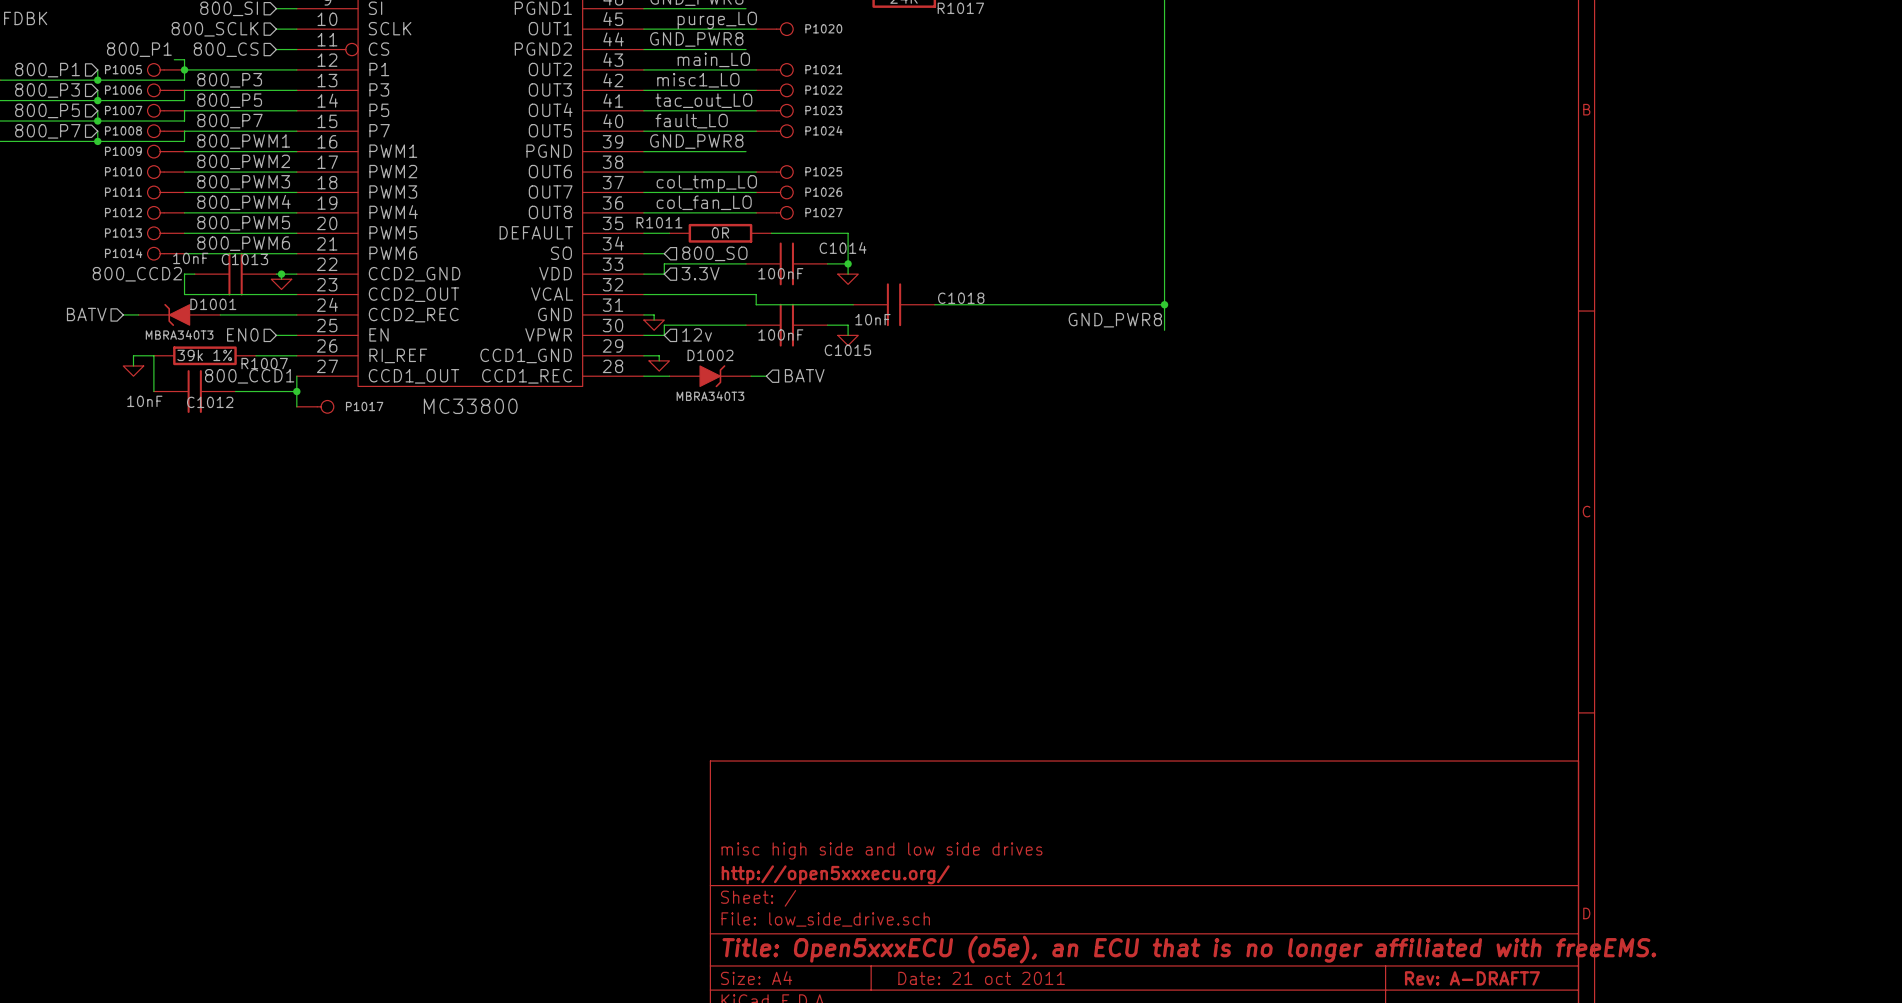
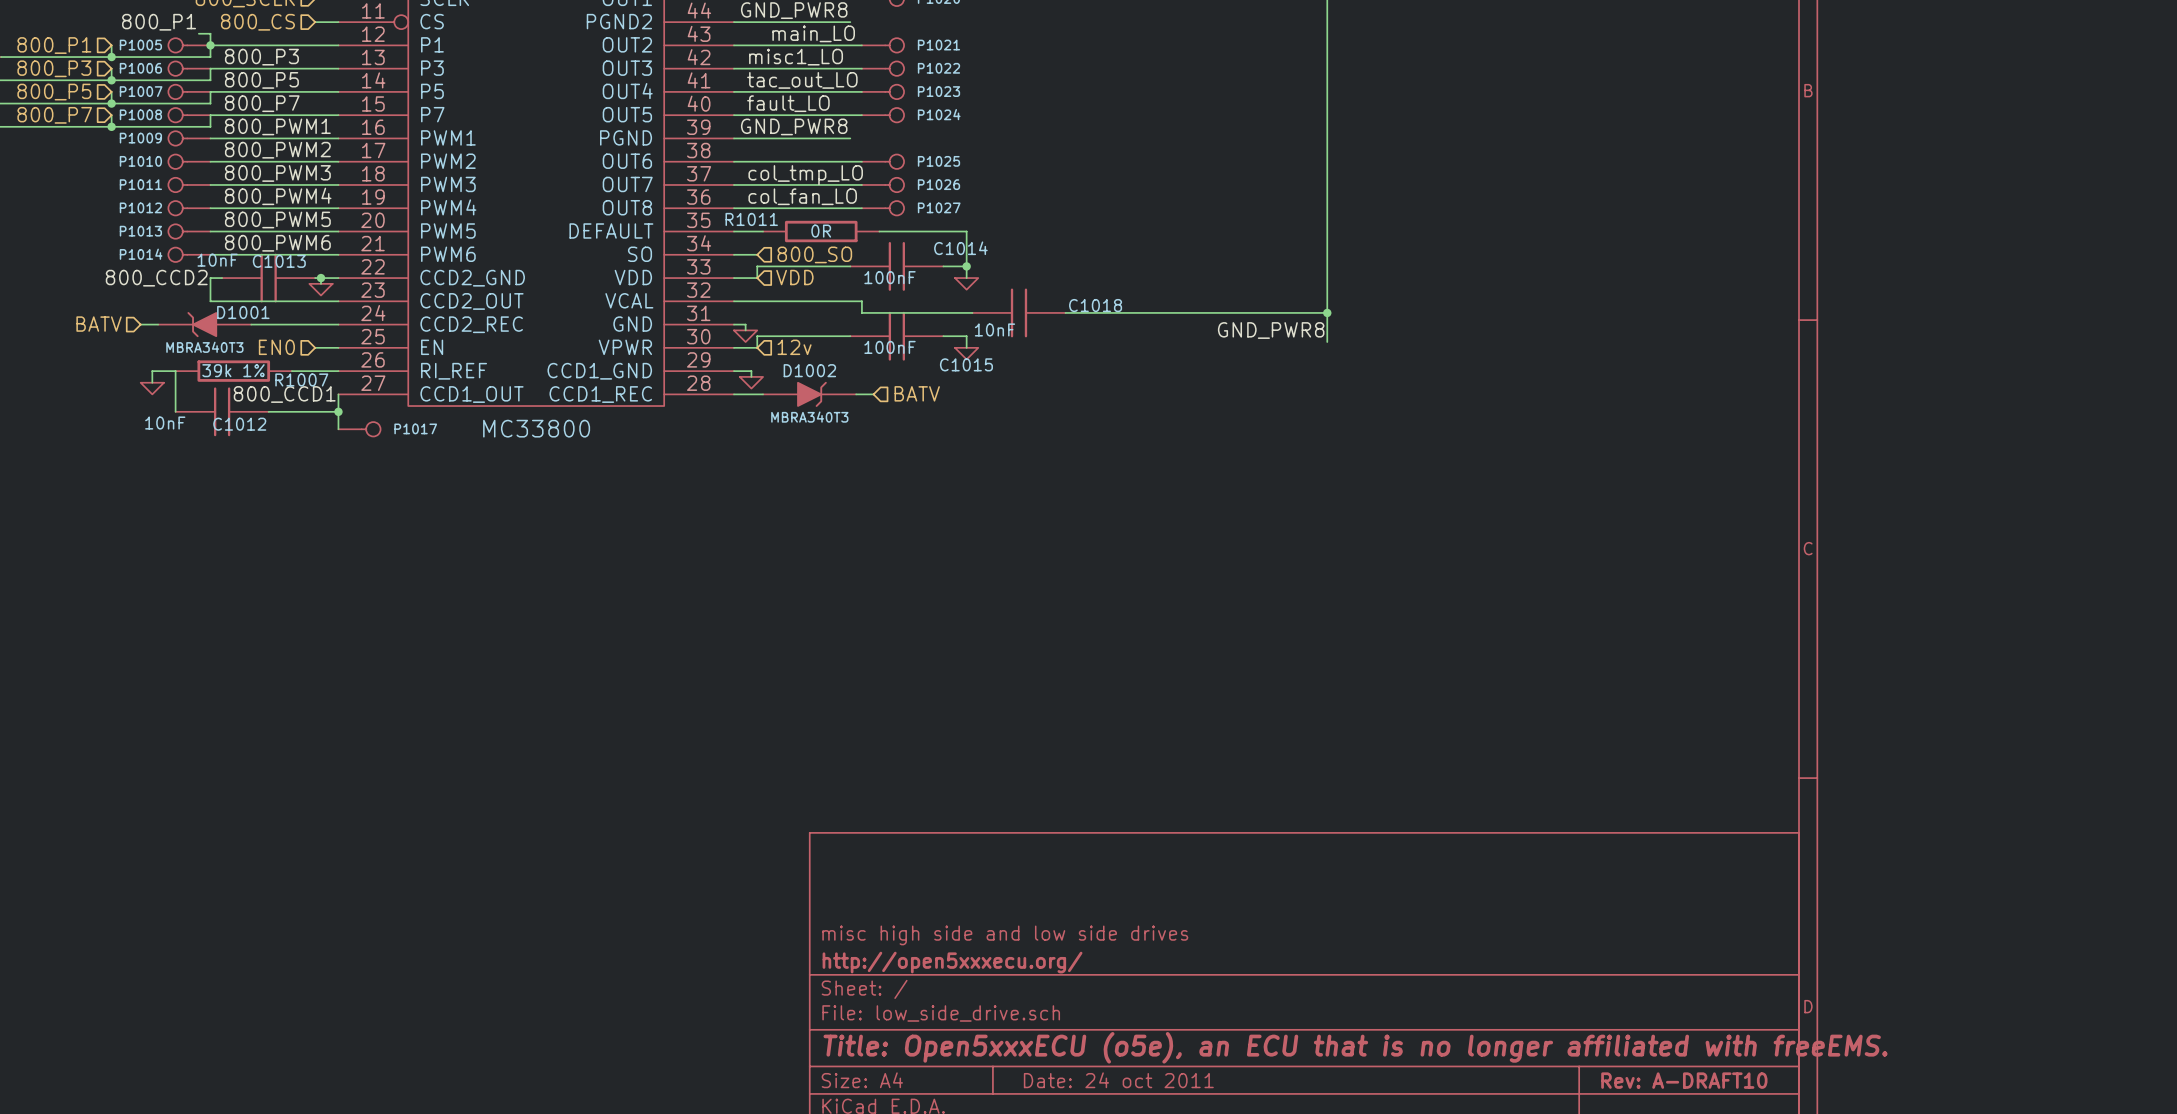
hierarchical label: 3.3V (700, 273) -> VDD (794, 277)
title block: Date: 21 oct 2011 (981, 978) -> Date: 24 oct 2011 (1118, 1080)
title block: Rev: A-DRAFT7 (1472, 978) -> Rev: A-DRAFT10 (1684, 1080)

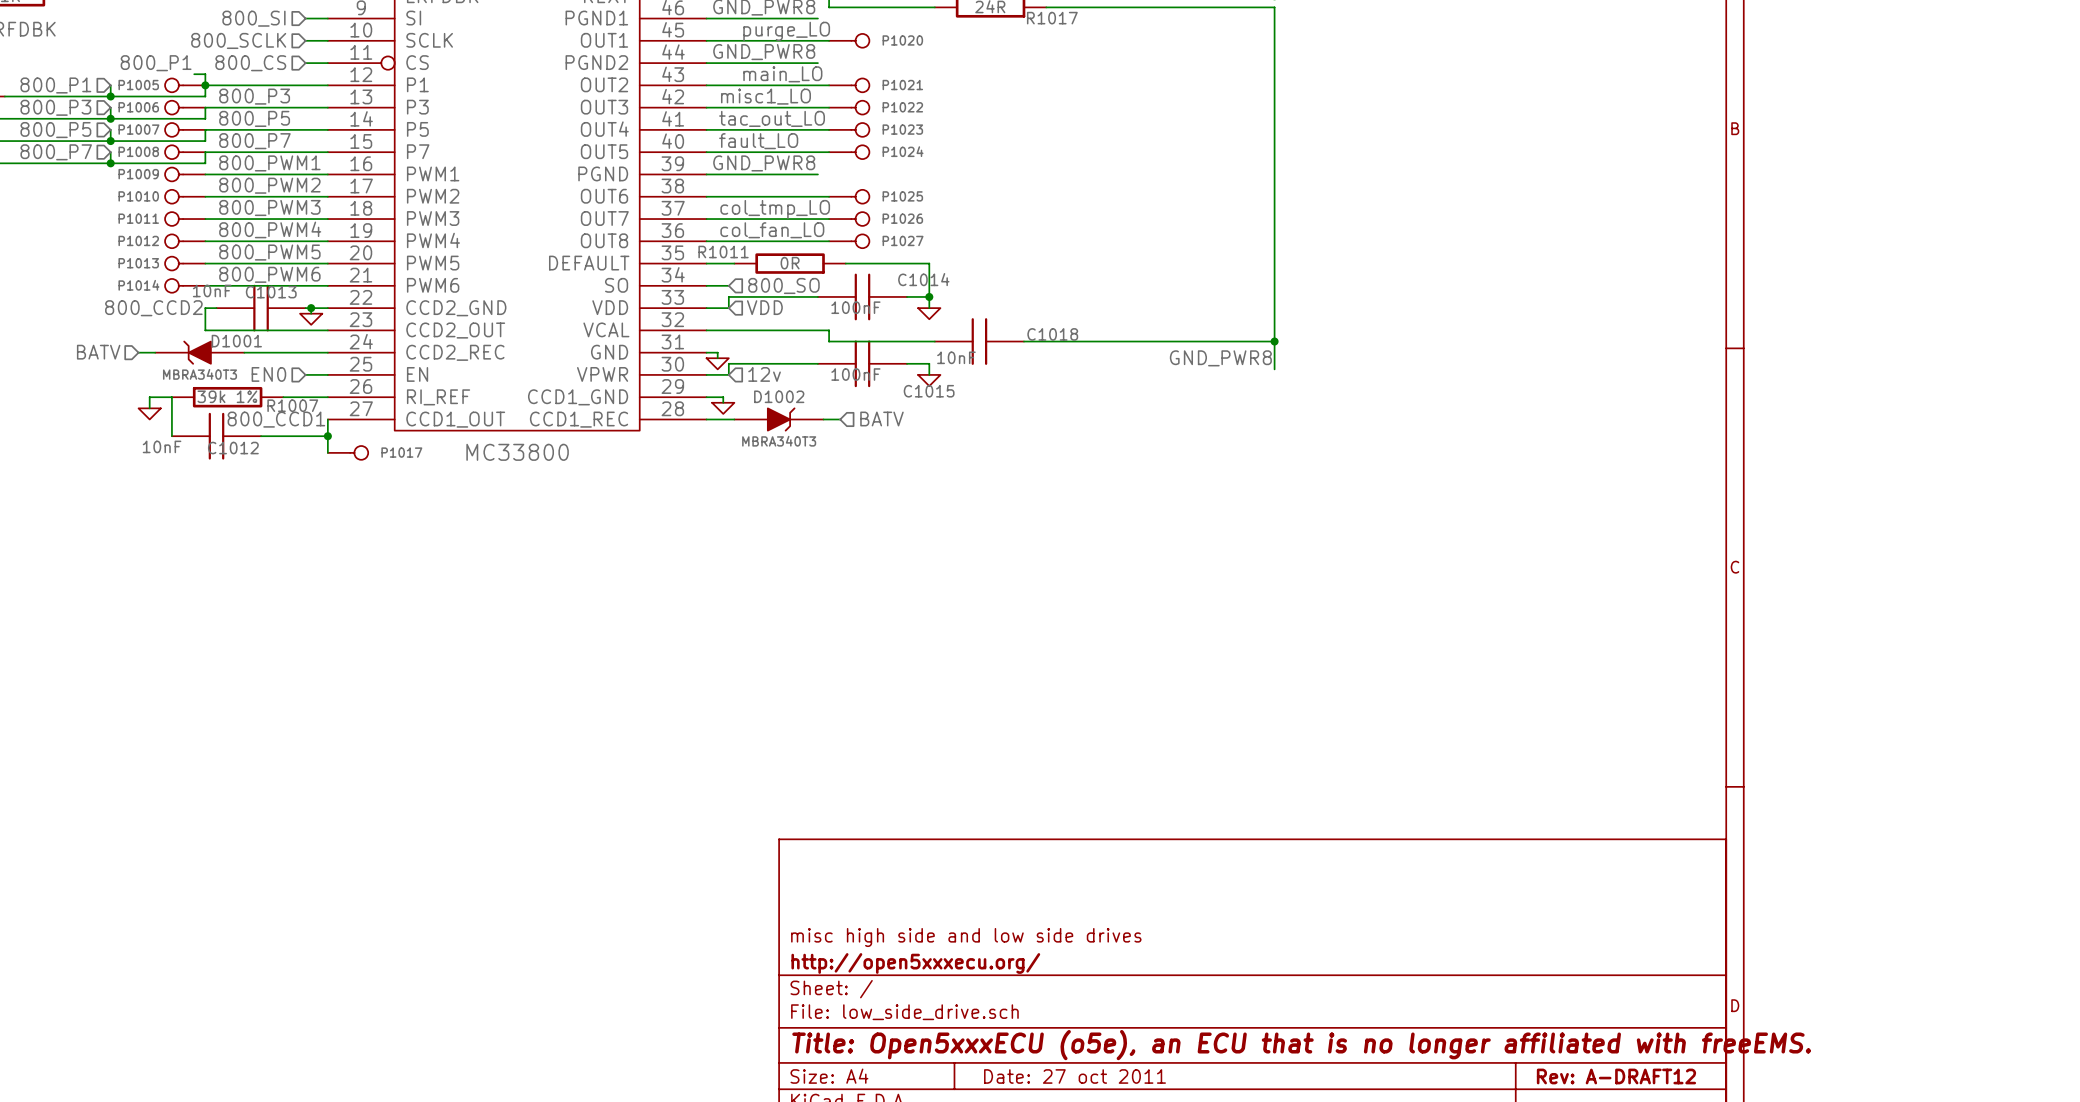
title block: Date: 24 oct 2011 (1118, 1080) -> Date: 27 oct 2011 (1075, 1076)
title block: Rev: A-DRAFT10 (1684, 1080) -> Rev: A-DRAFT12 (1616, 1076)

